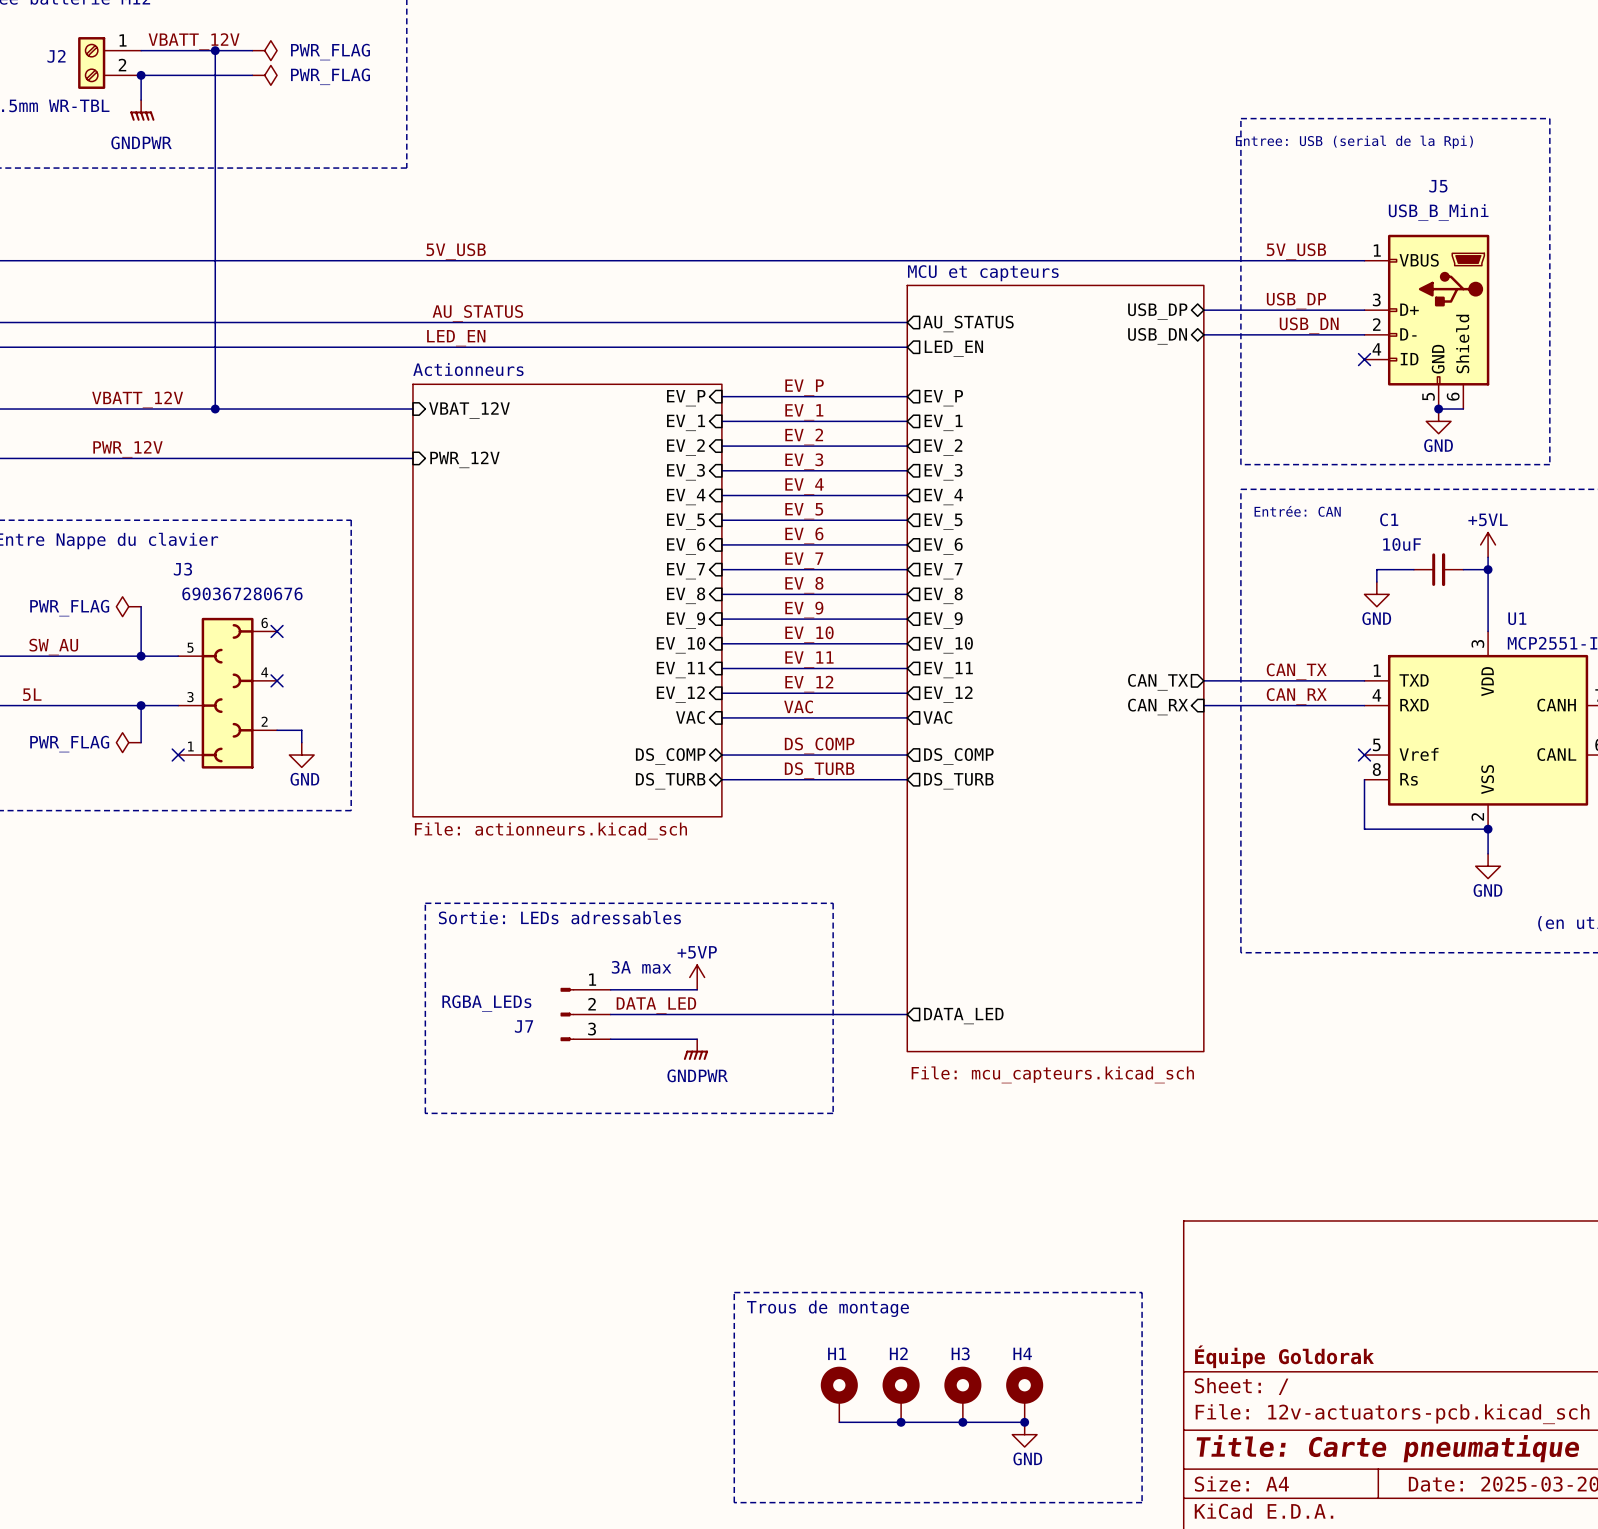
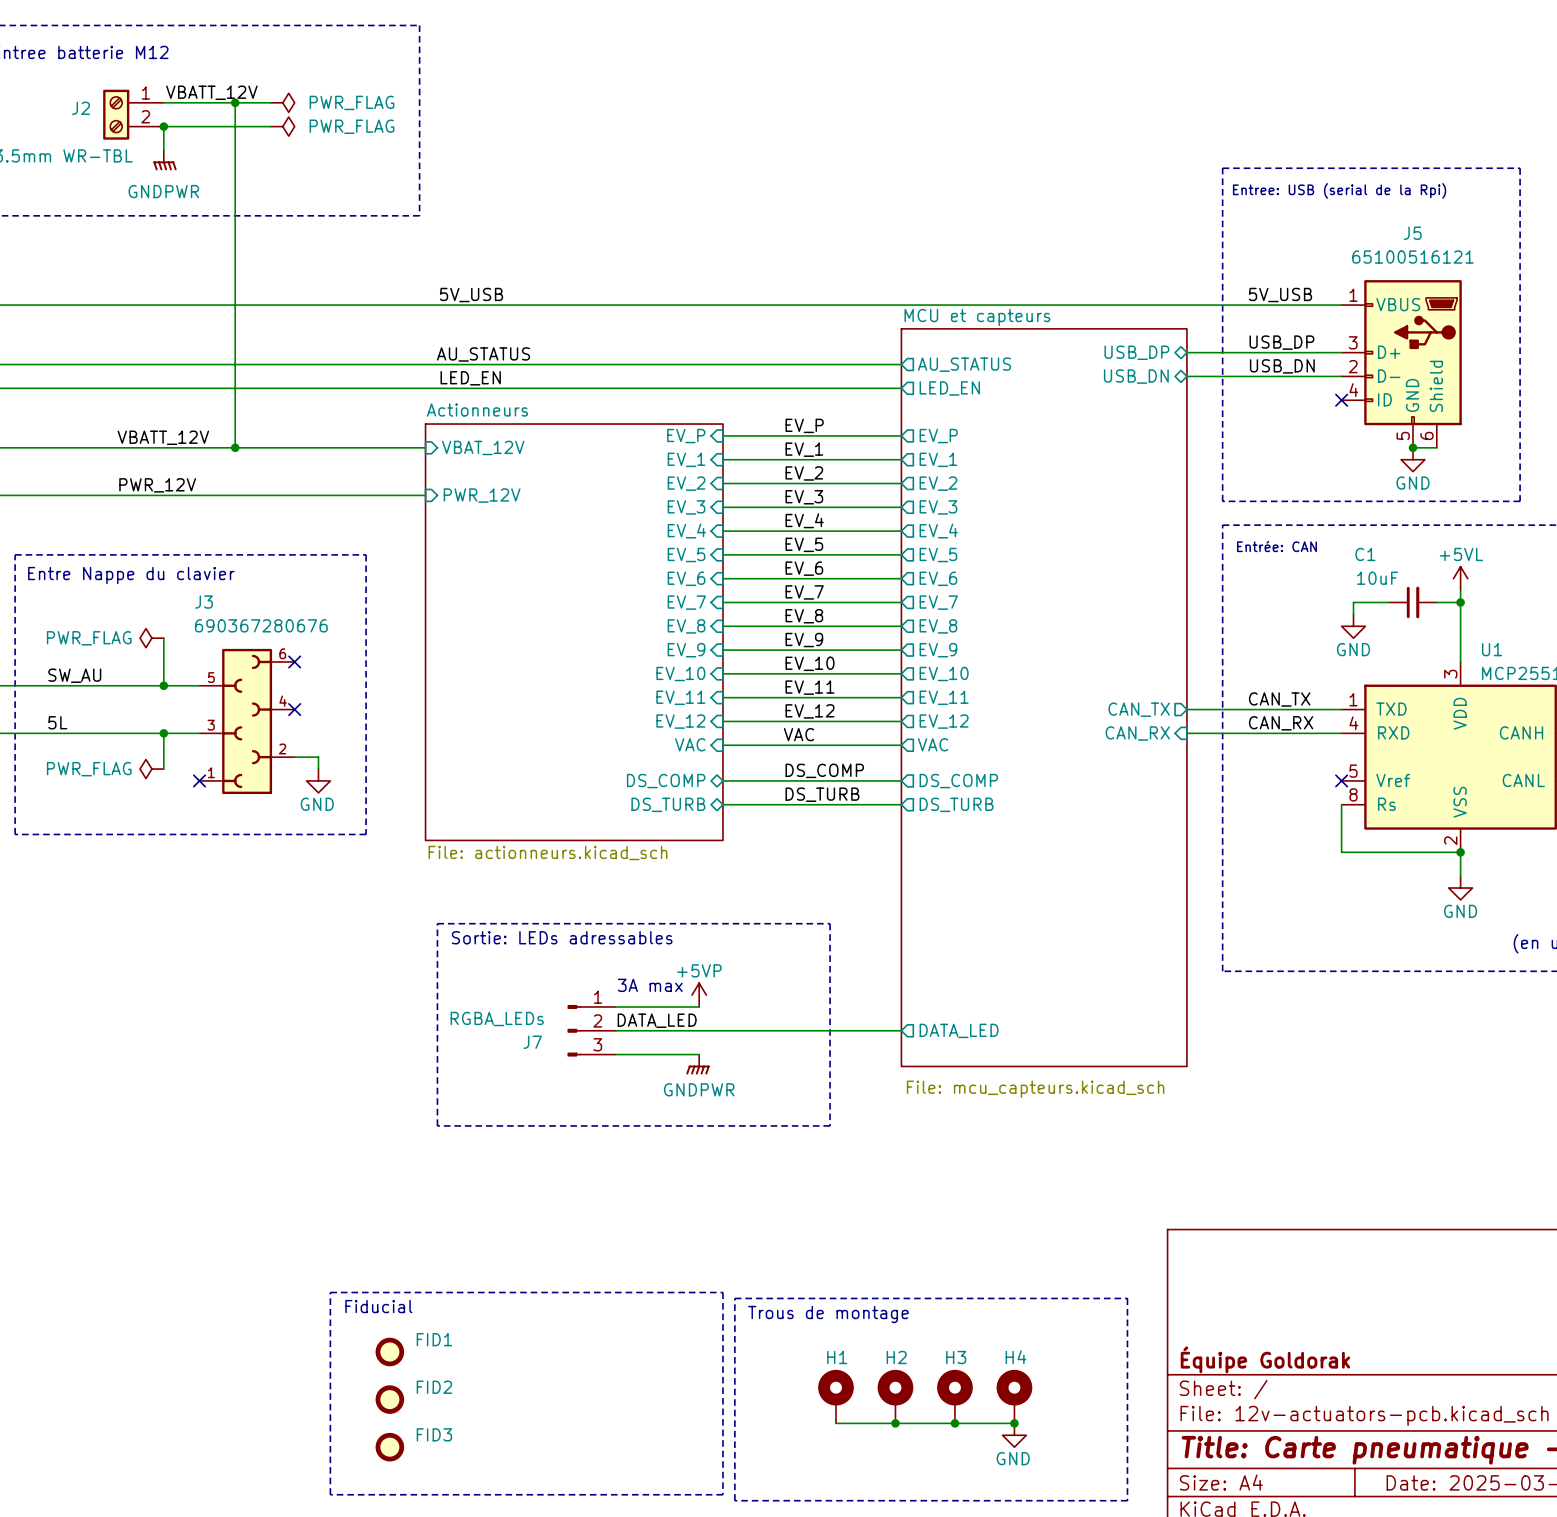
J5 value: USB_B_Mini (1438, 212) -> 65100516121 (1413, 257)
line: none -> (330, 1292) (722, 1292) (722, 1494) (330, 1494) (330, 1292)
text: none -> Fiducial (378, 1306)
FID1: none -> (389, 1352)
FID2: none -> (389, 1399)
FID3: none -> (389, 1447)

